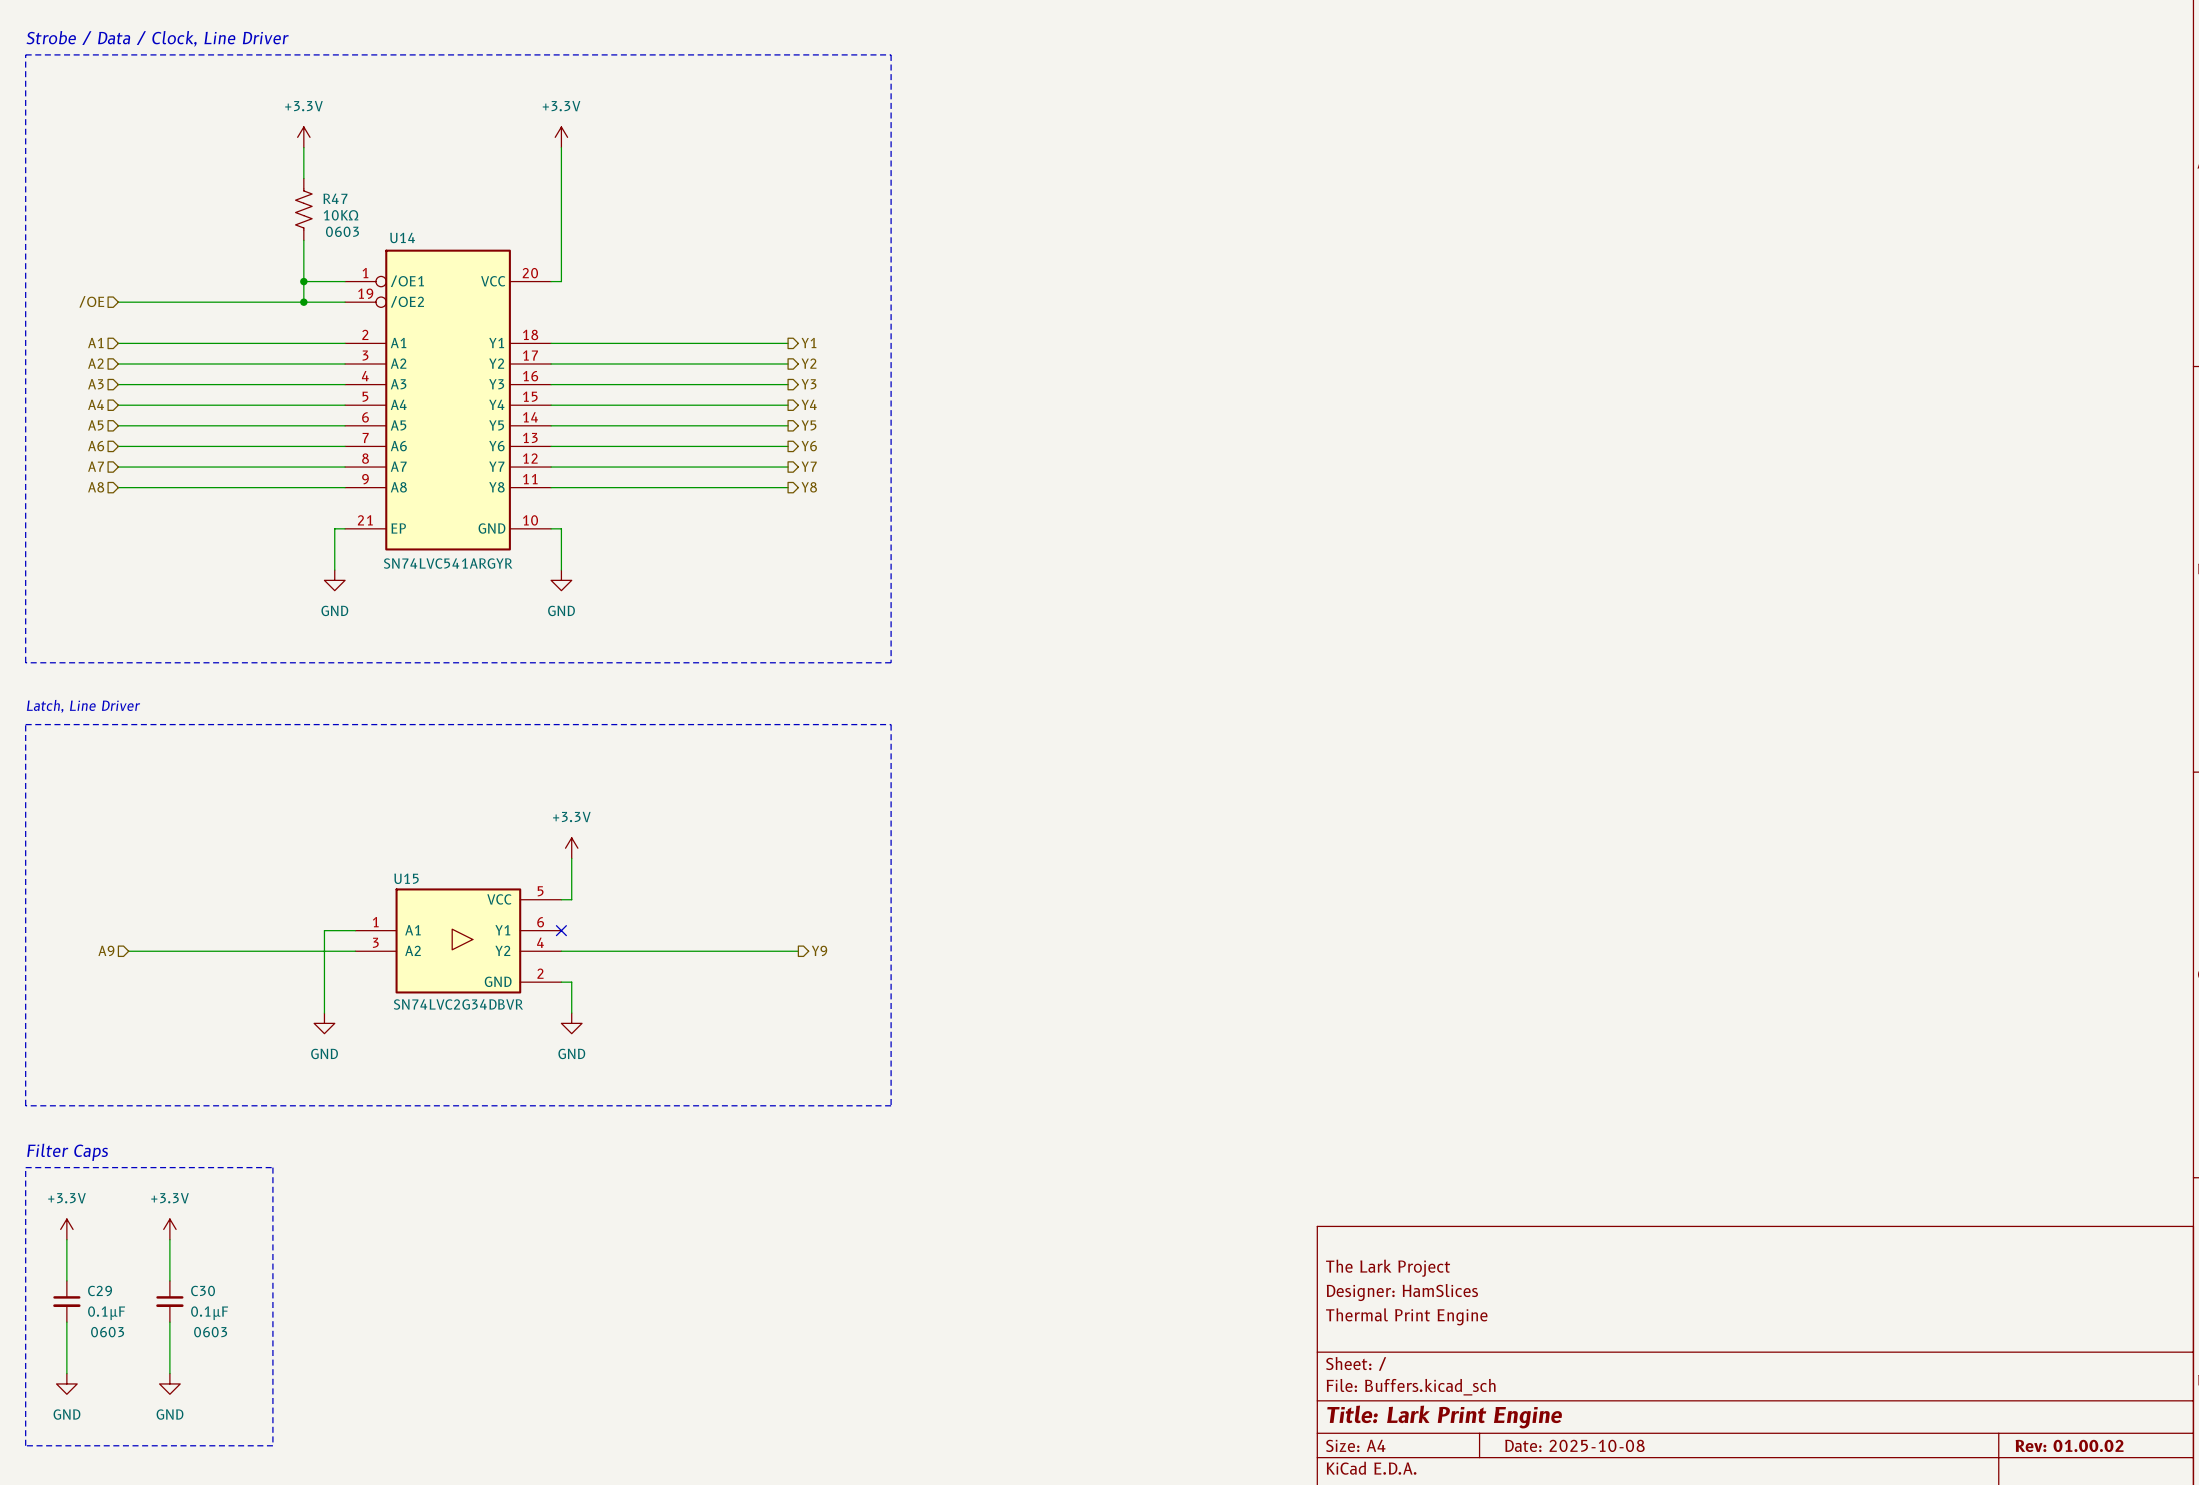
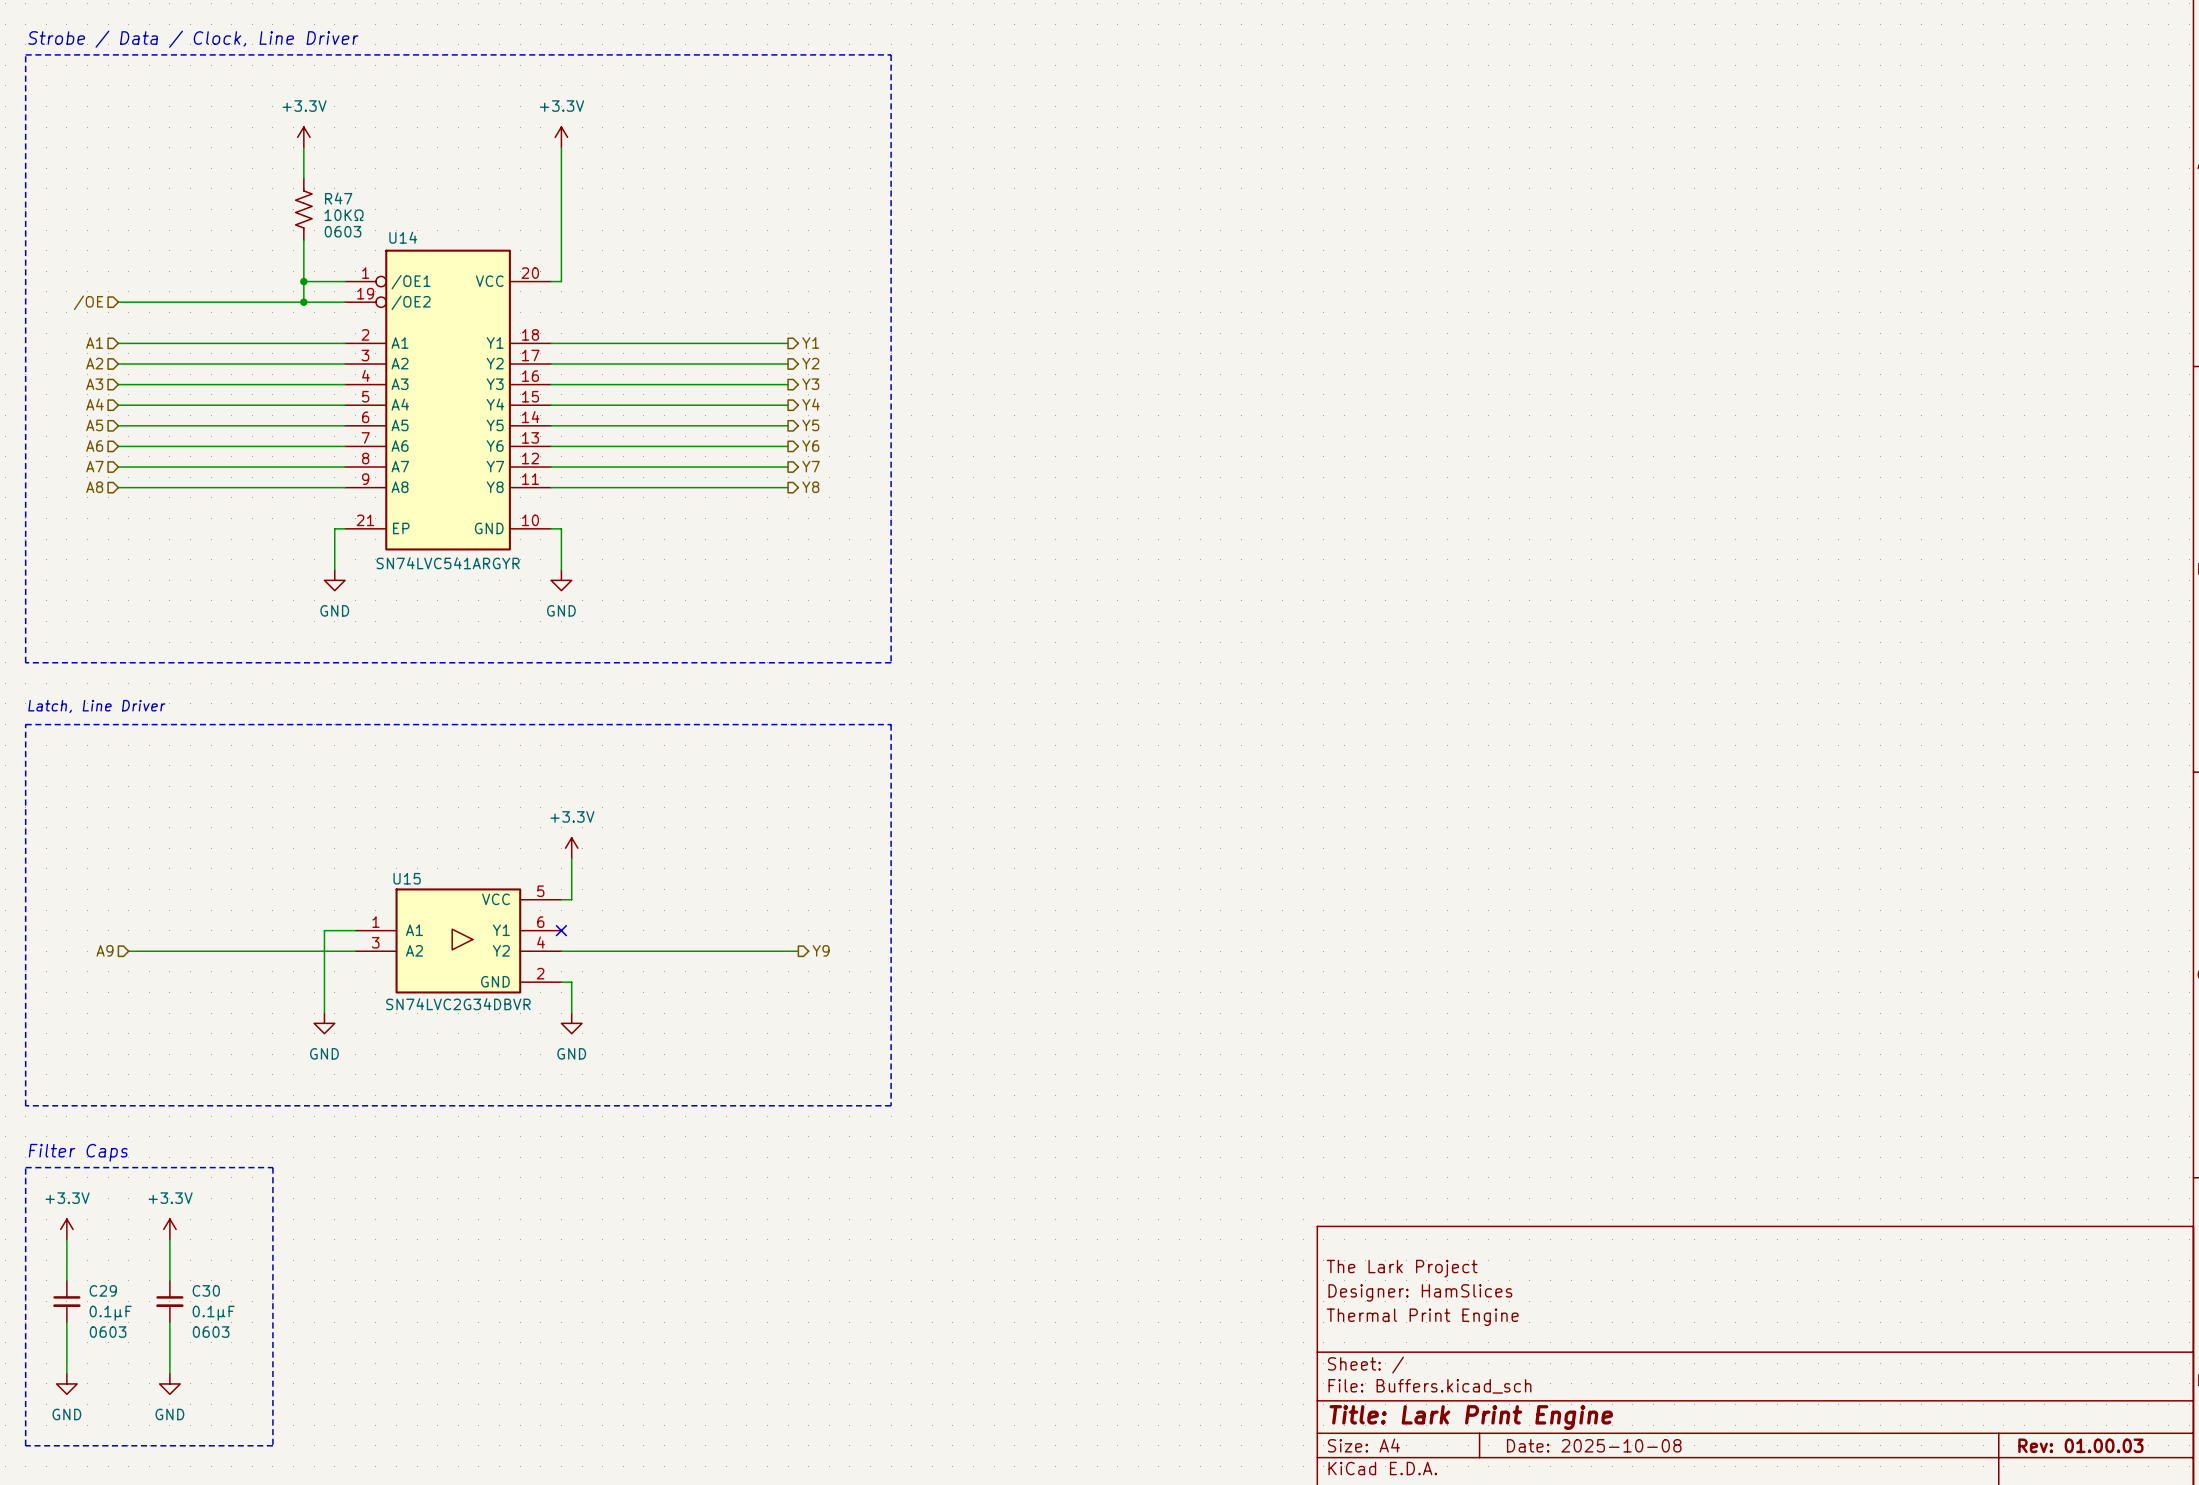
title block: Rev: 01.00.02 (2069, 1445) -> Rev: 01.00.03 (2080, 1445)

